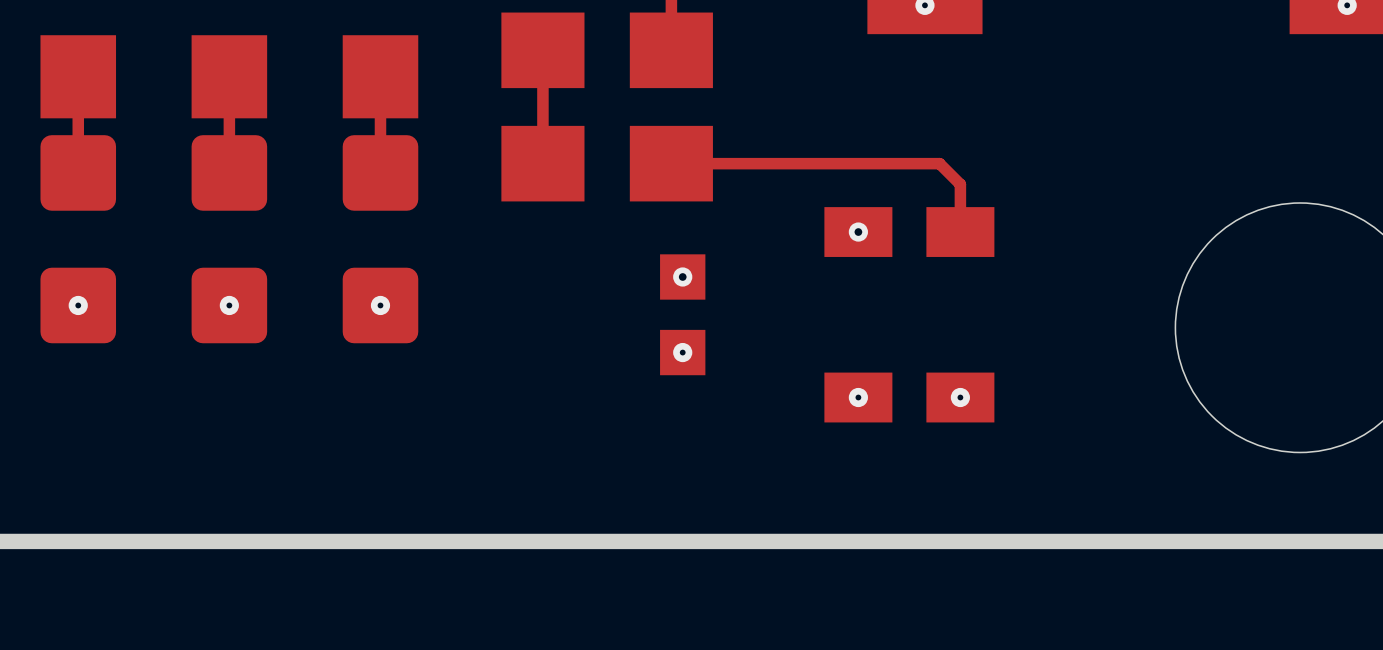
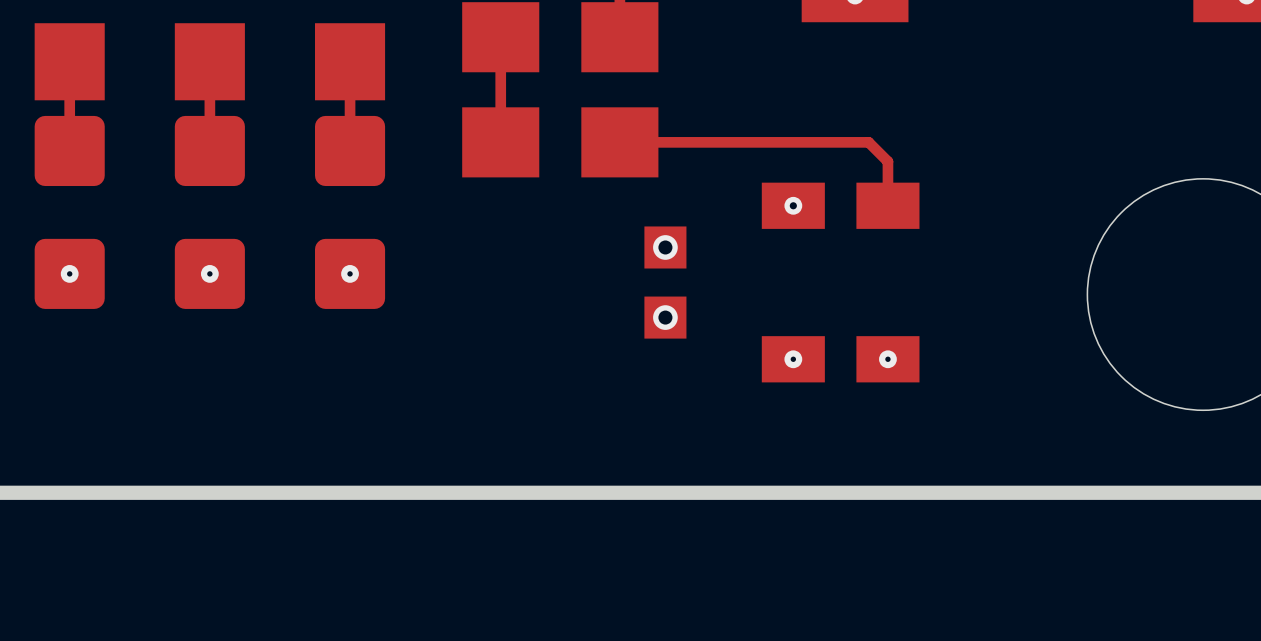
via: (682, 276) -> none
via: none -> (665, 247)
part position: (682, 314) -> (665, 282)
via: (682, 352) -> none
via: none -> (665, 317)

